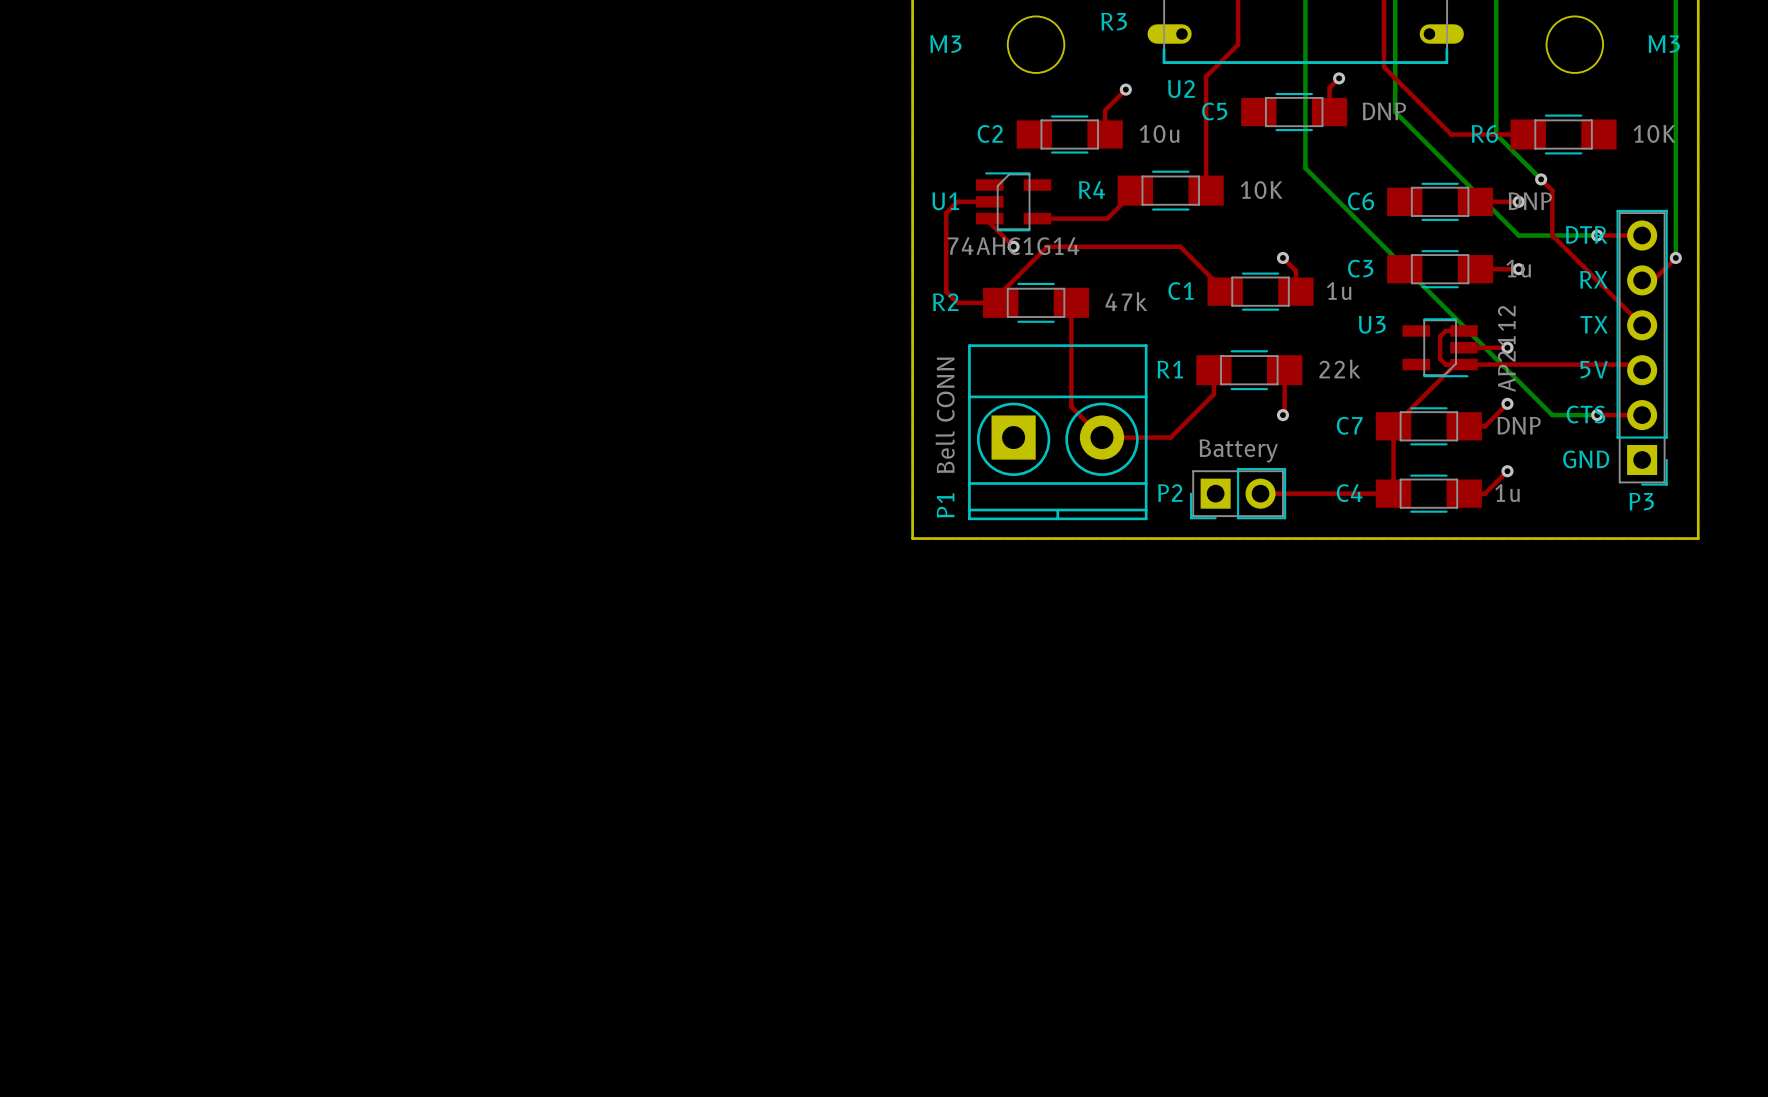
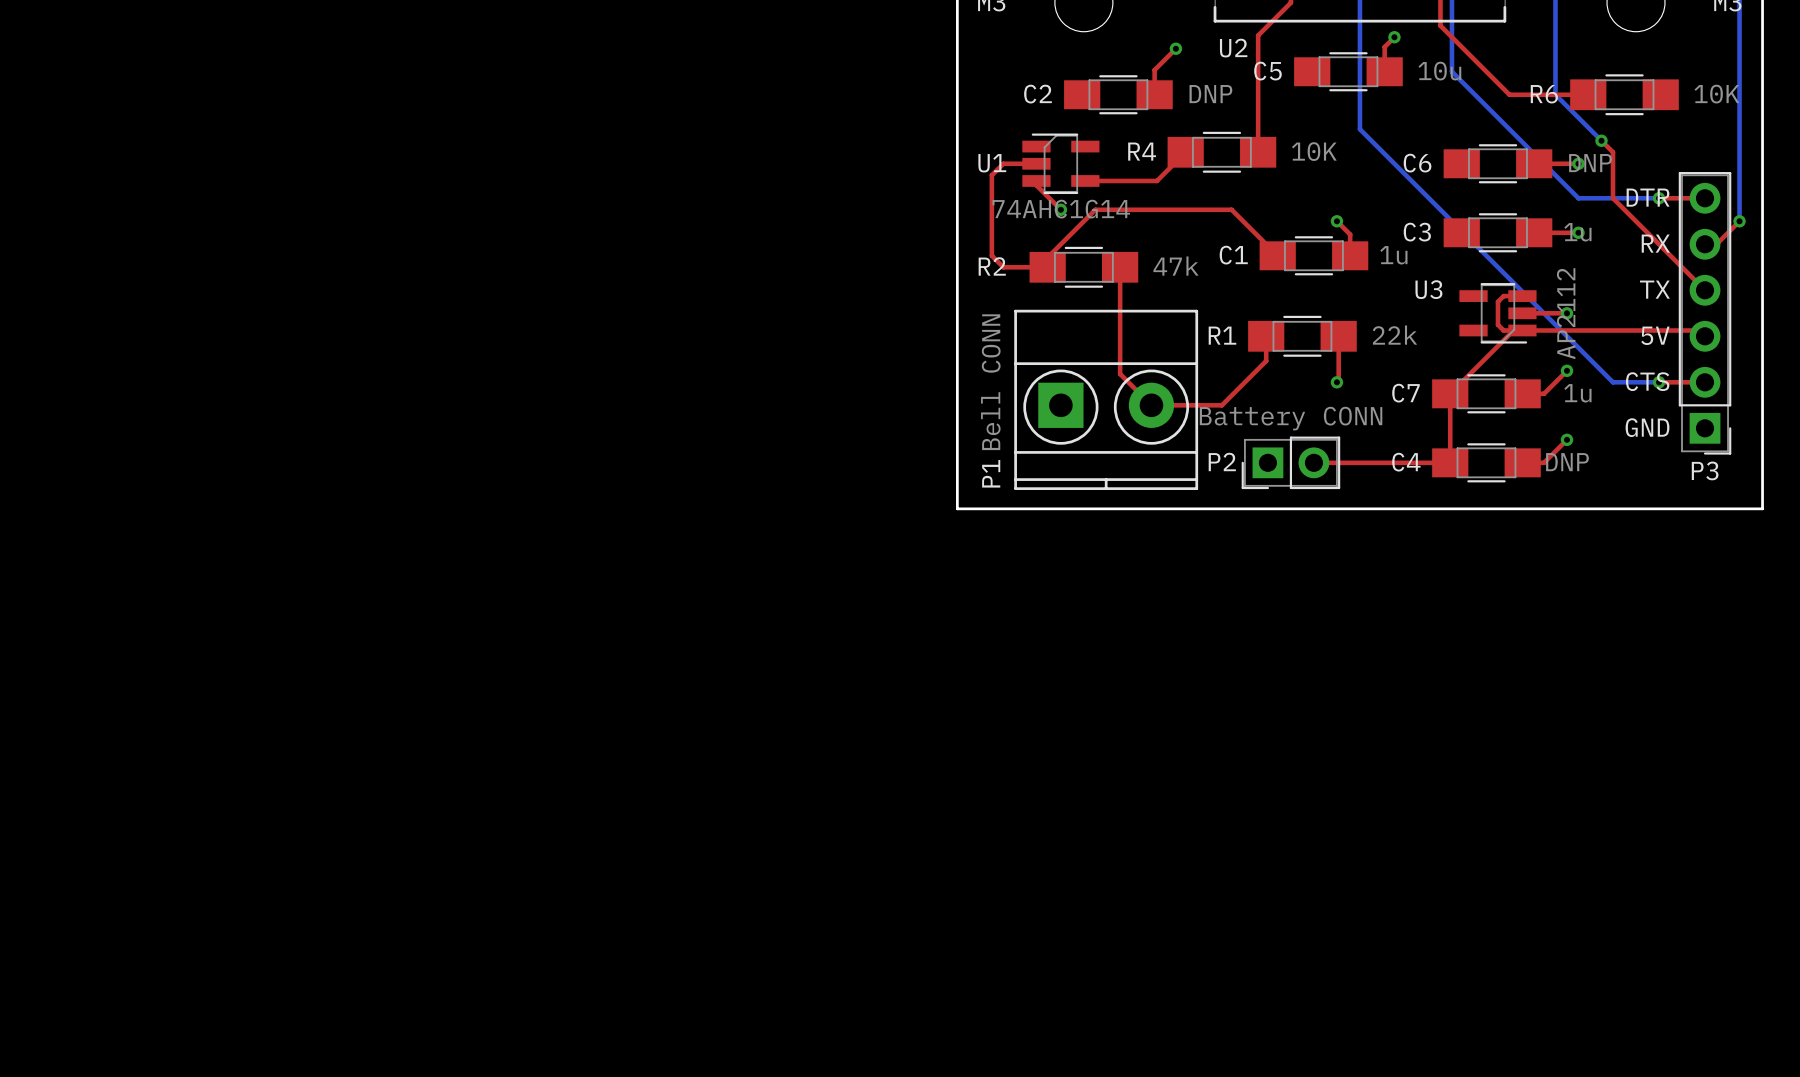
C5 value: DNP (1384, 111) -> 10u (1439, 71)
C2 value: 10u (1159, 133) -> DNP (1210, 94)
C7 value: DNP (1519, 425) -> 1u (1577, 393)
P2 value: Battery (1238, 450) -> Battery CONN (1291, 418)
C4 value: 1u (1507, 493) -> DNP (1567, 462)

